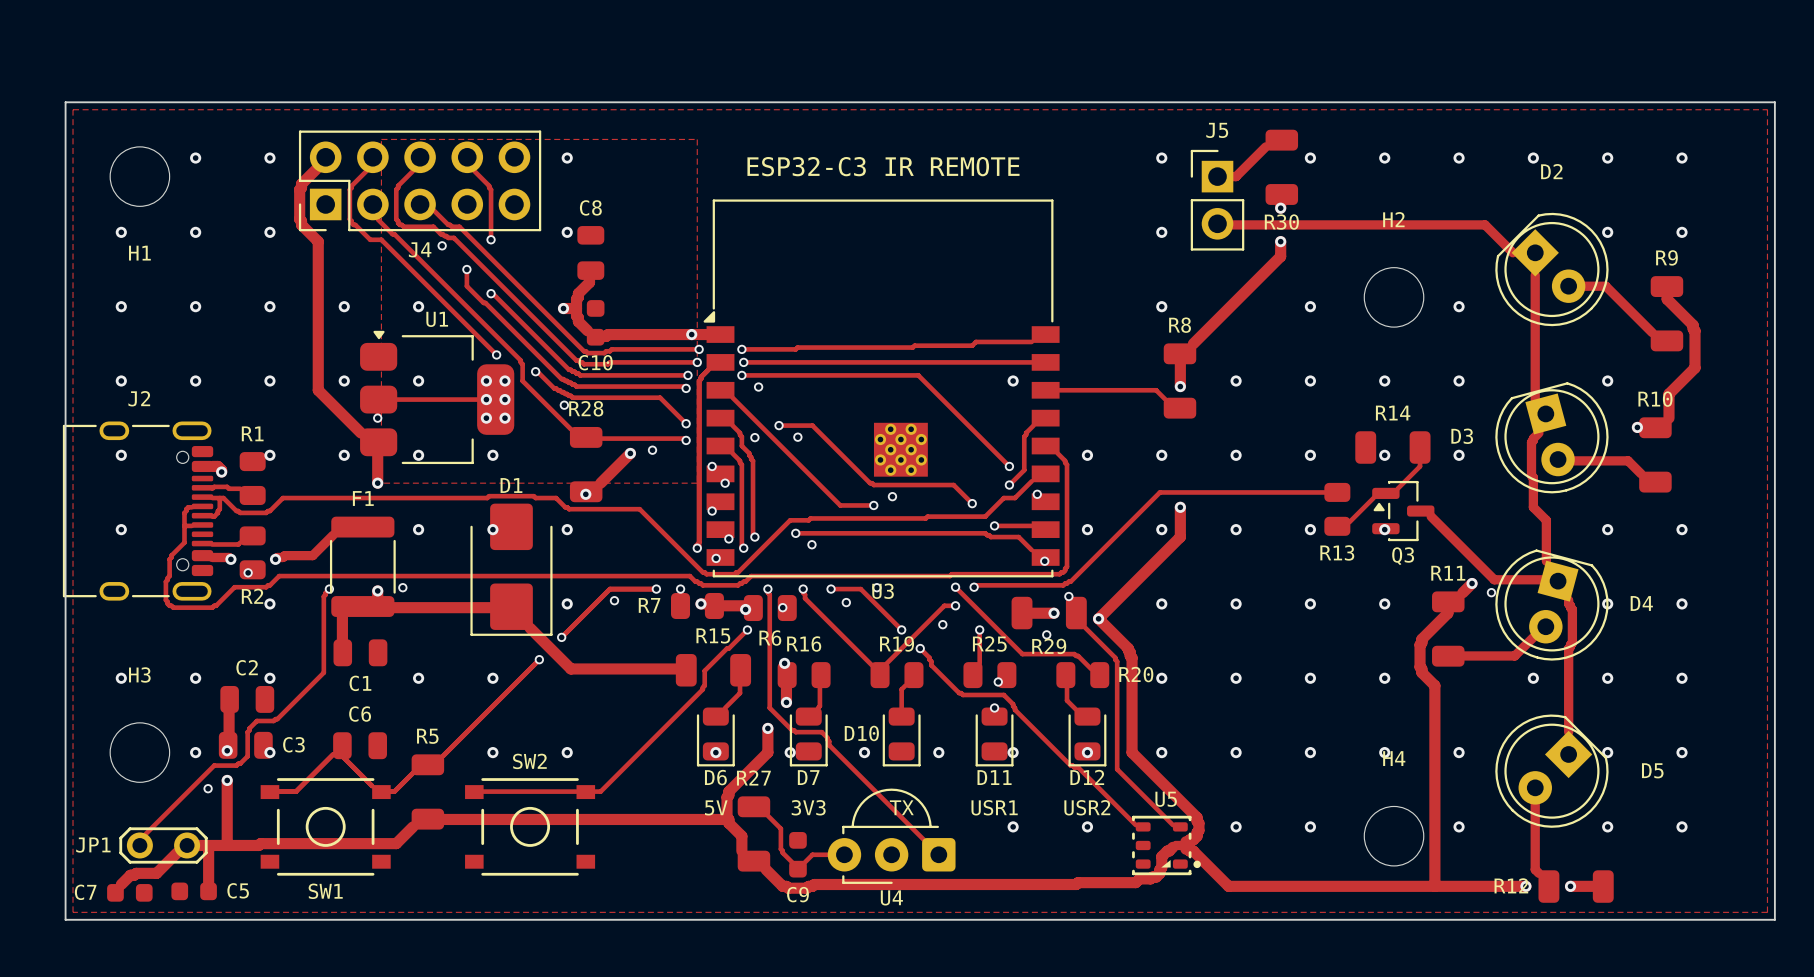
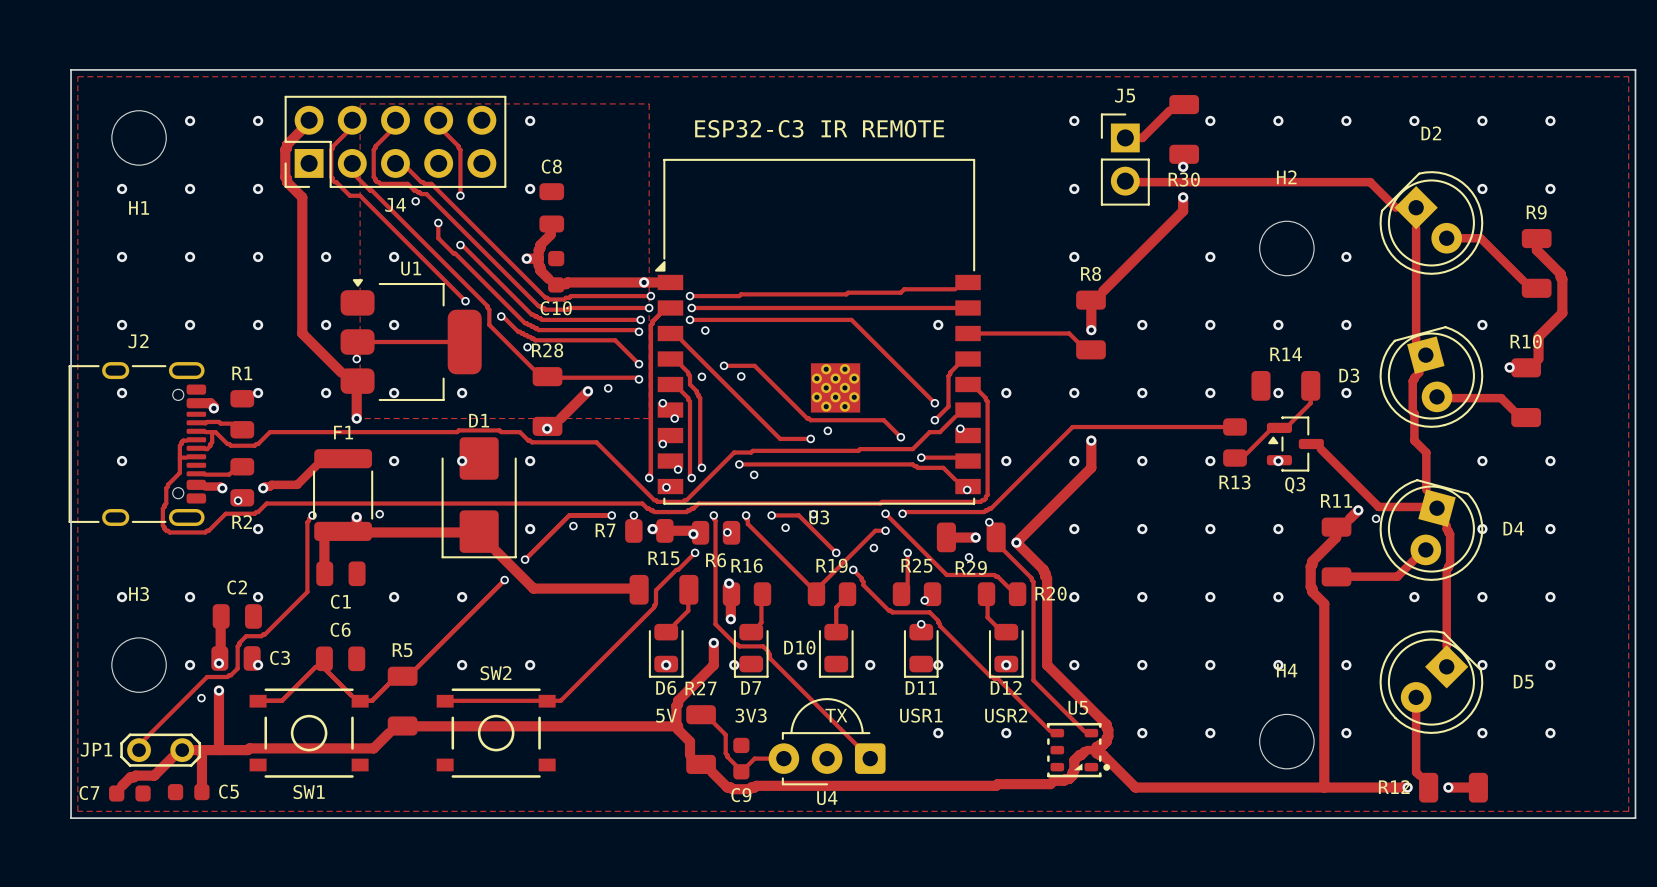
via: (486, 380) -> none
via: (504, 380) -> none
via: (486, 399) -> none
via: (504, 399) -> none
via: (486, 418) -> none
via: (504, 418) -> none

